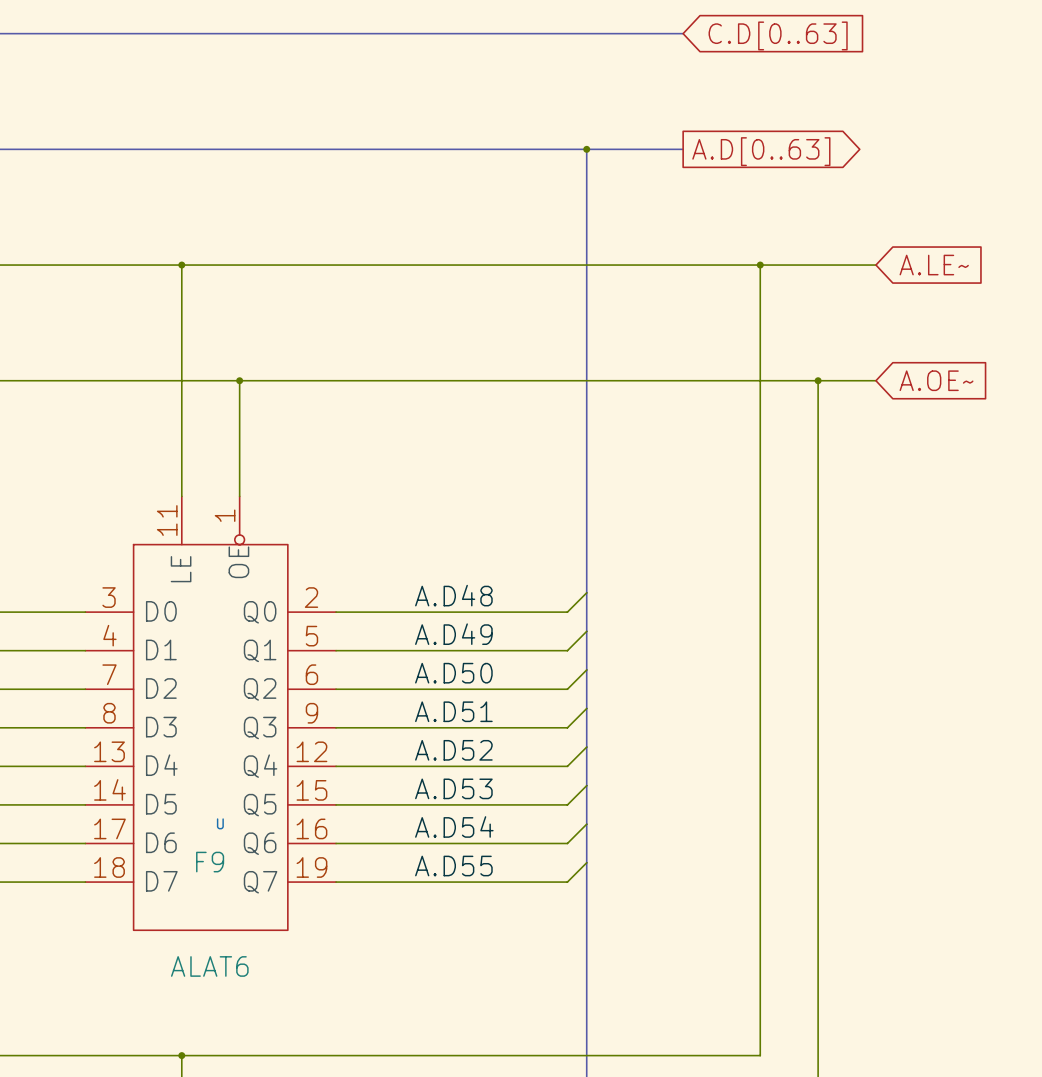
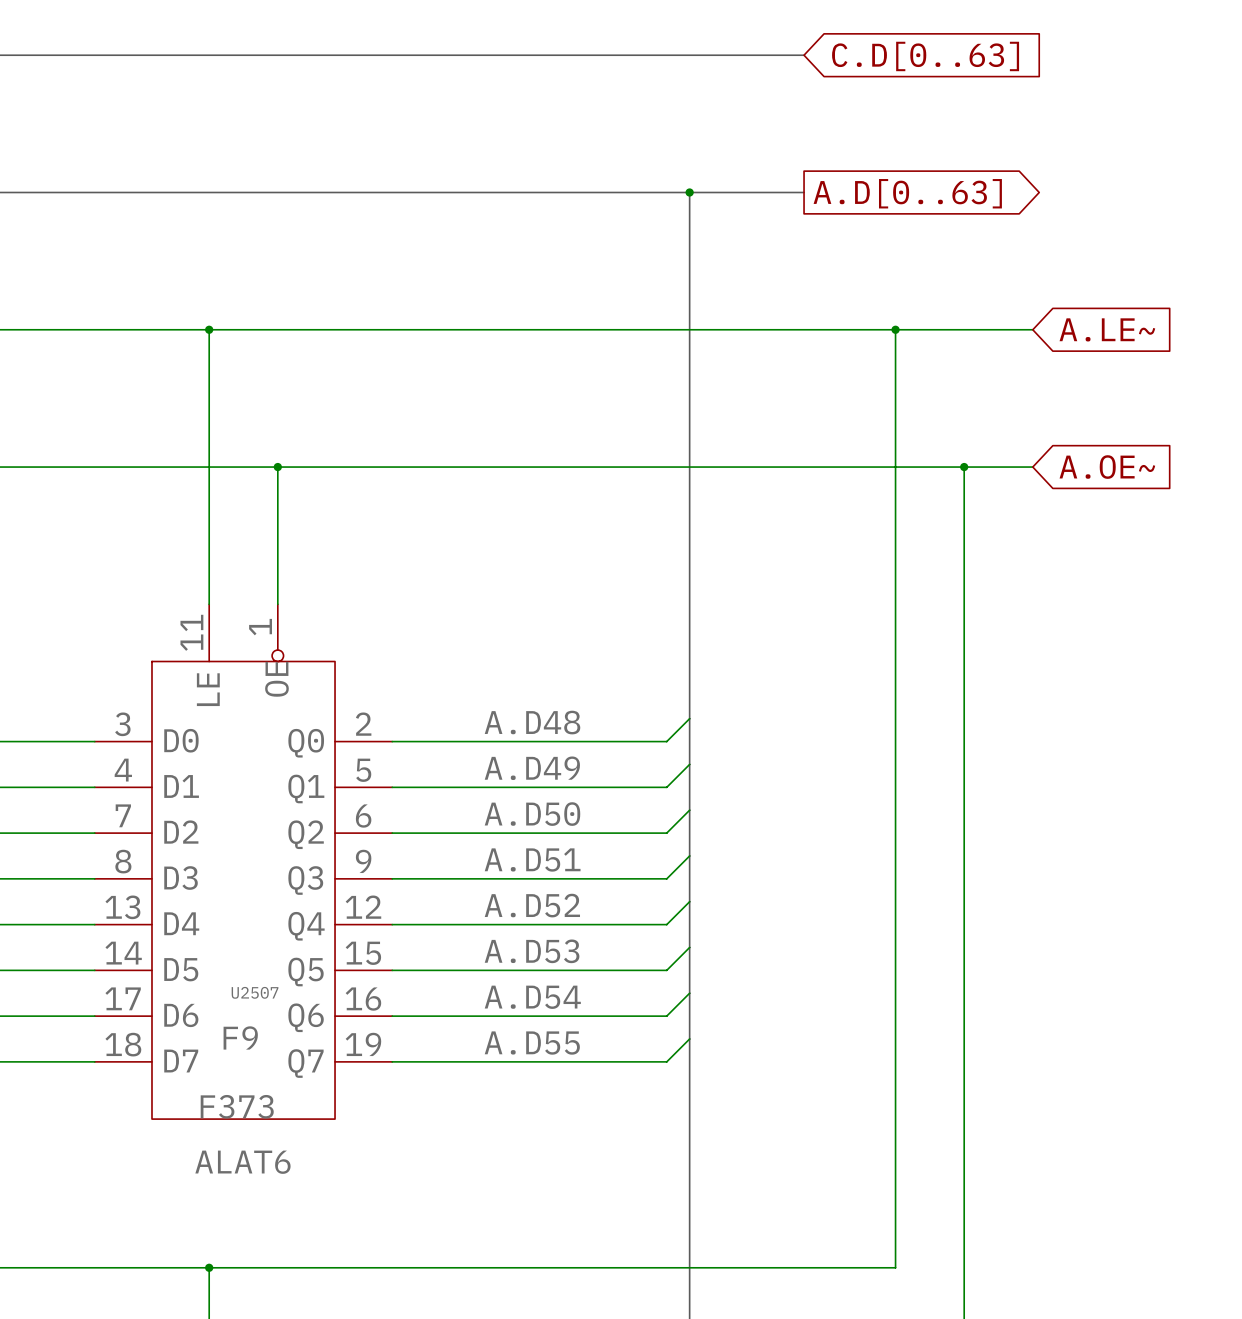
U name: U (220, 823) -> U2507 (255, 992)
U value: none -> F373 (237, 1106)

